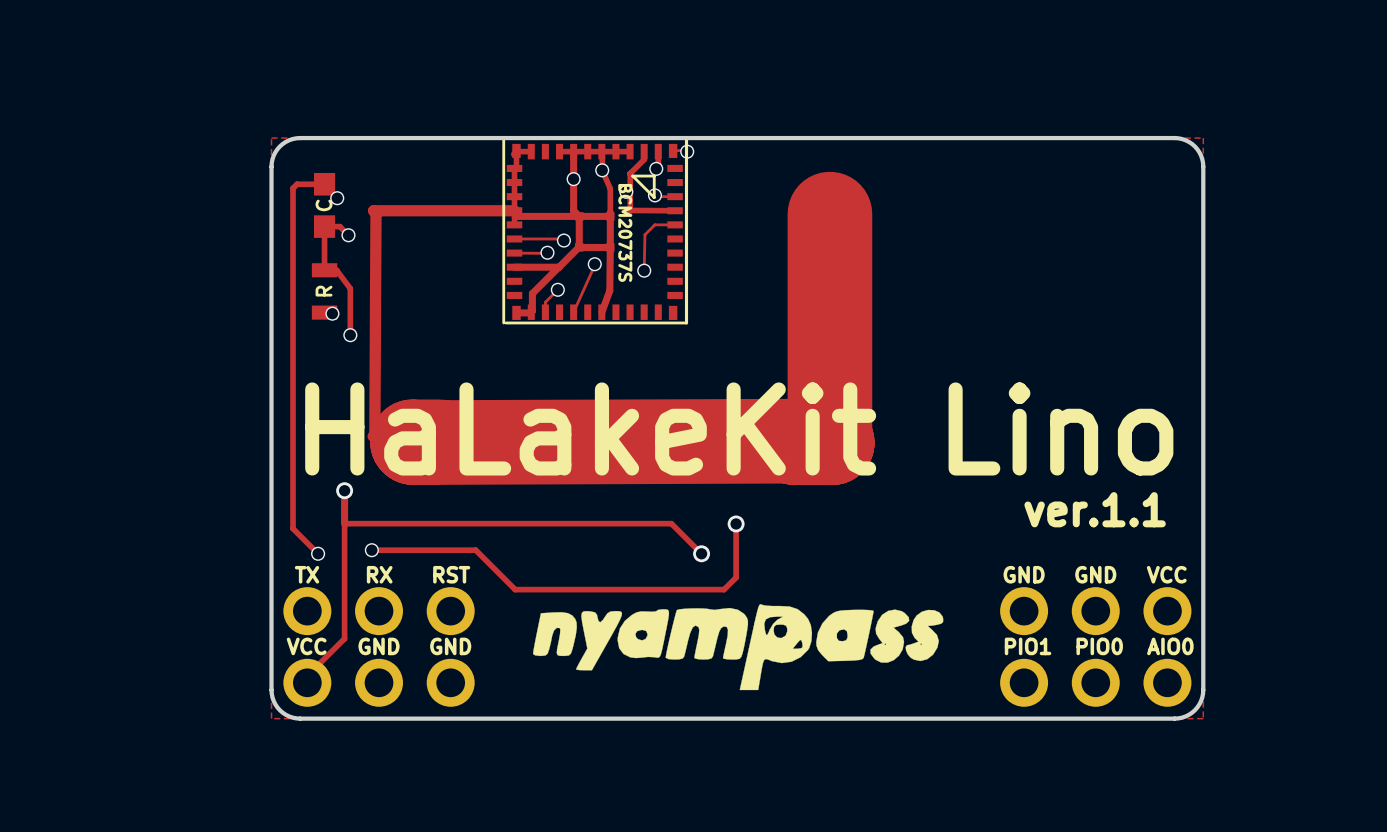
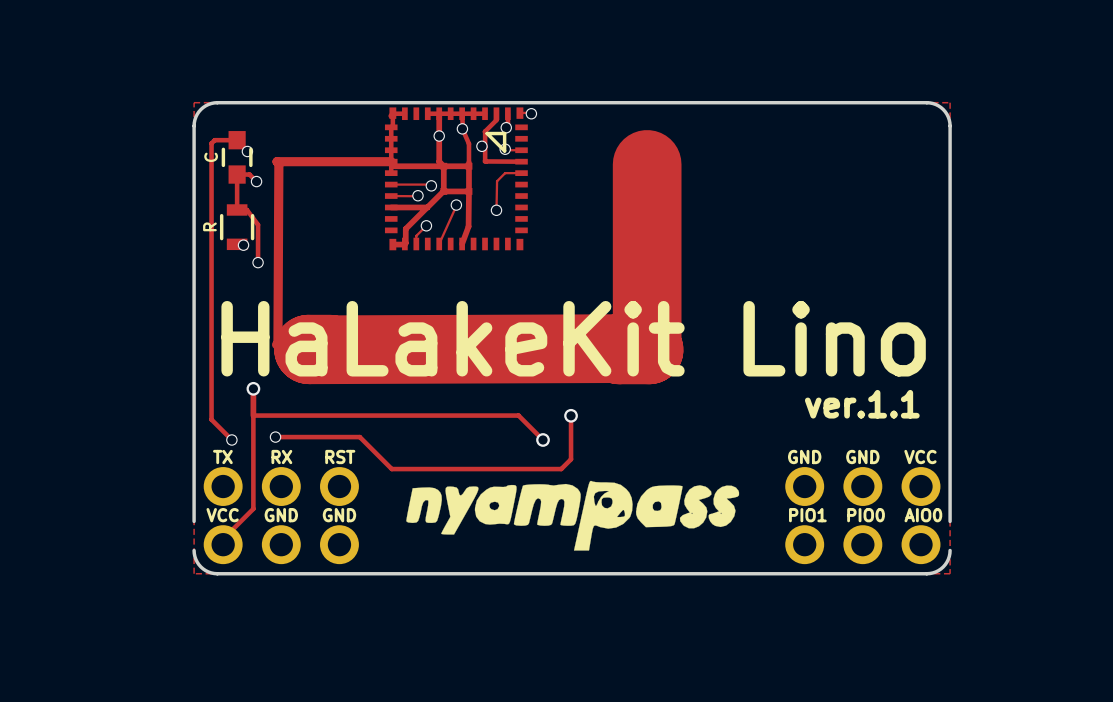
part footprint: [502, 138, 689, 325] -> [384, 107, 528, 251]
C footprint: [313, 172, 336, 238] -> [221, 131, 253, 184]
text: BCM20737S (625, 232) -> none
R footprint: [311, 263, 338, 320] -> [219, 204, 255, 251]
board edge: (271, 654) (271, 689) -> none
board edge: (1203, 654) (1203, 689) -> none

